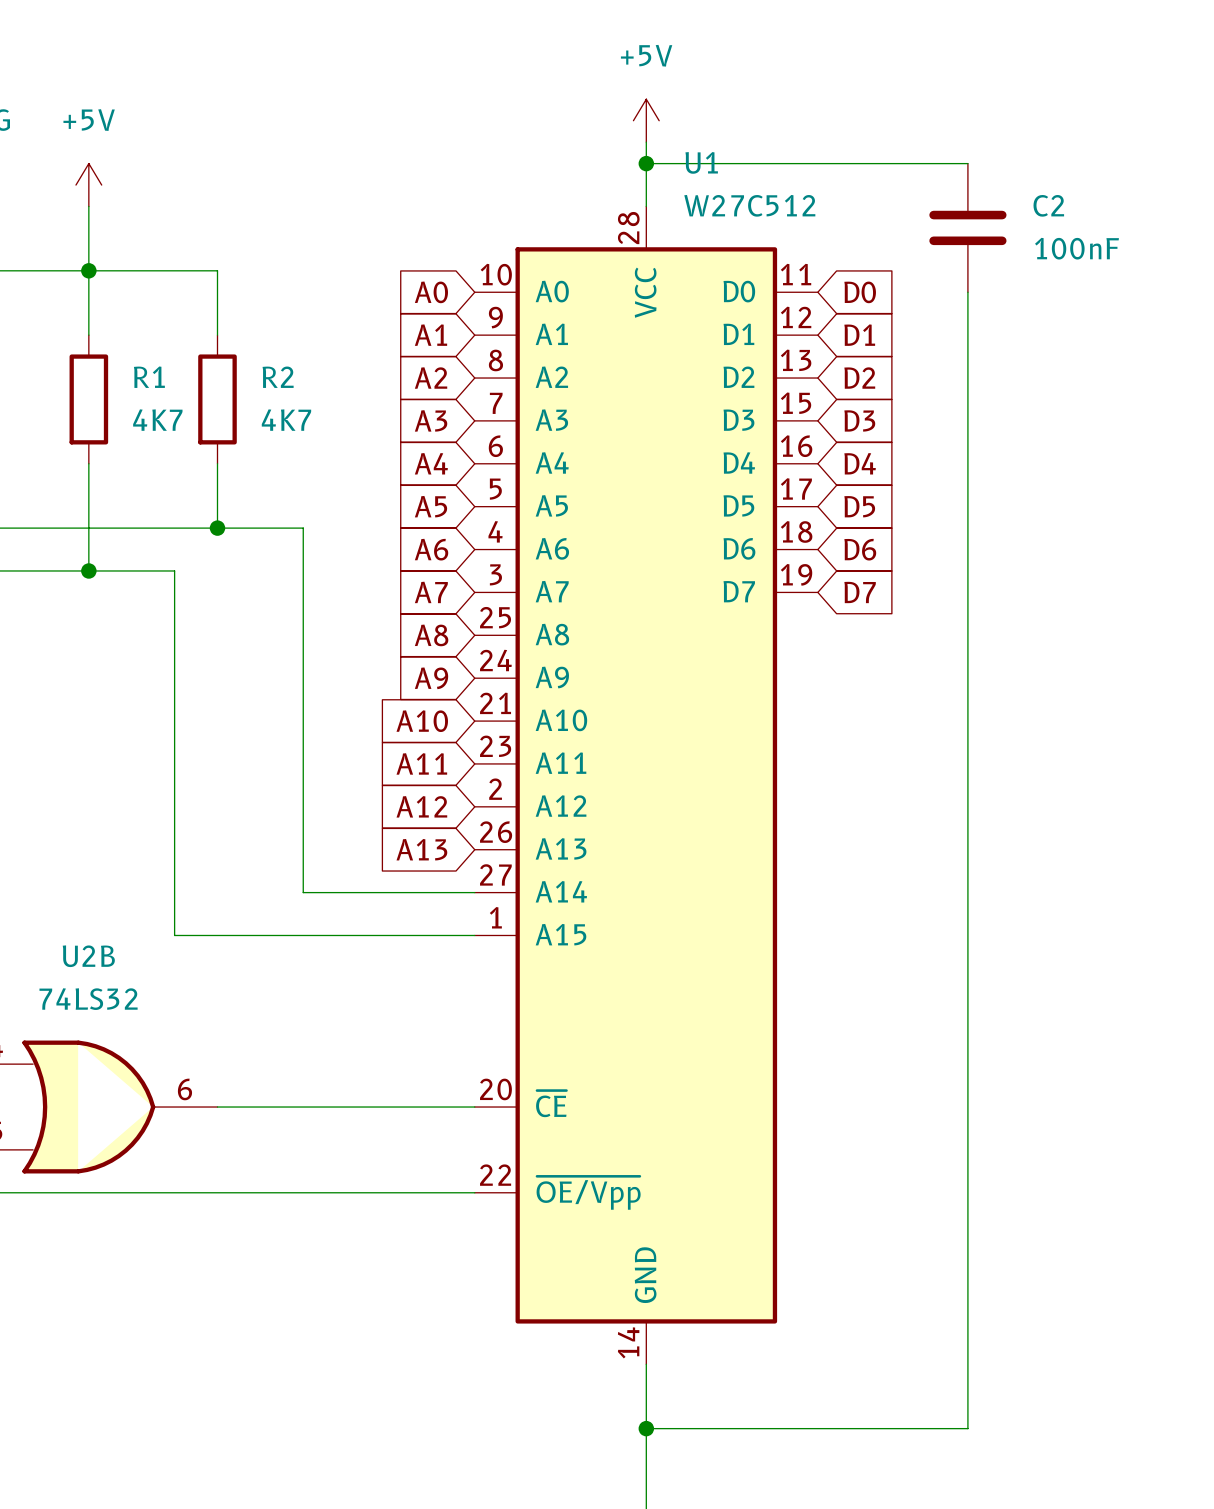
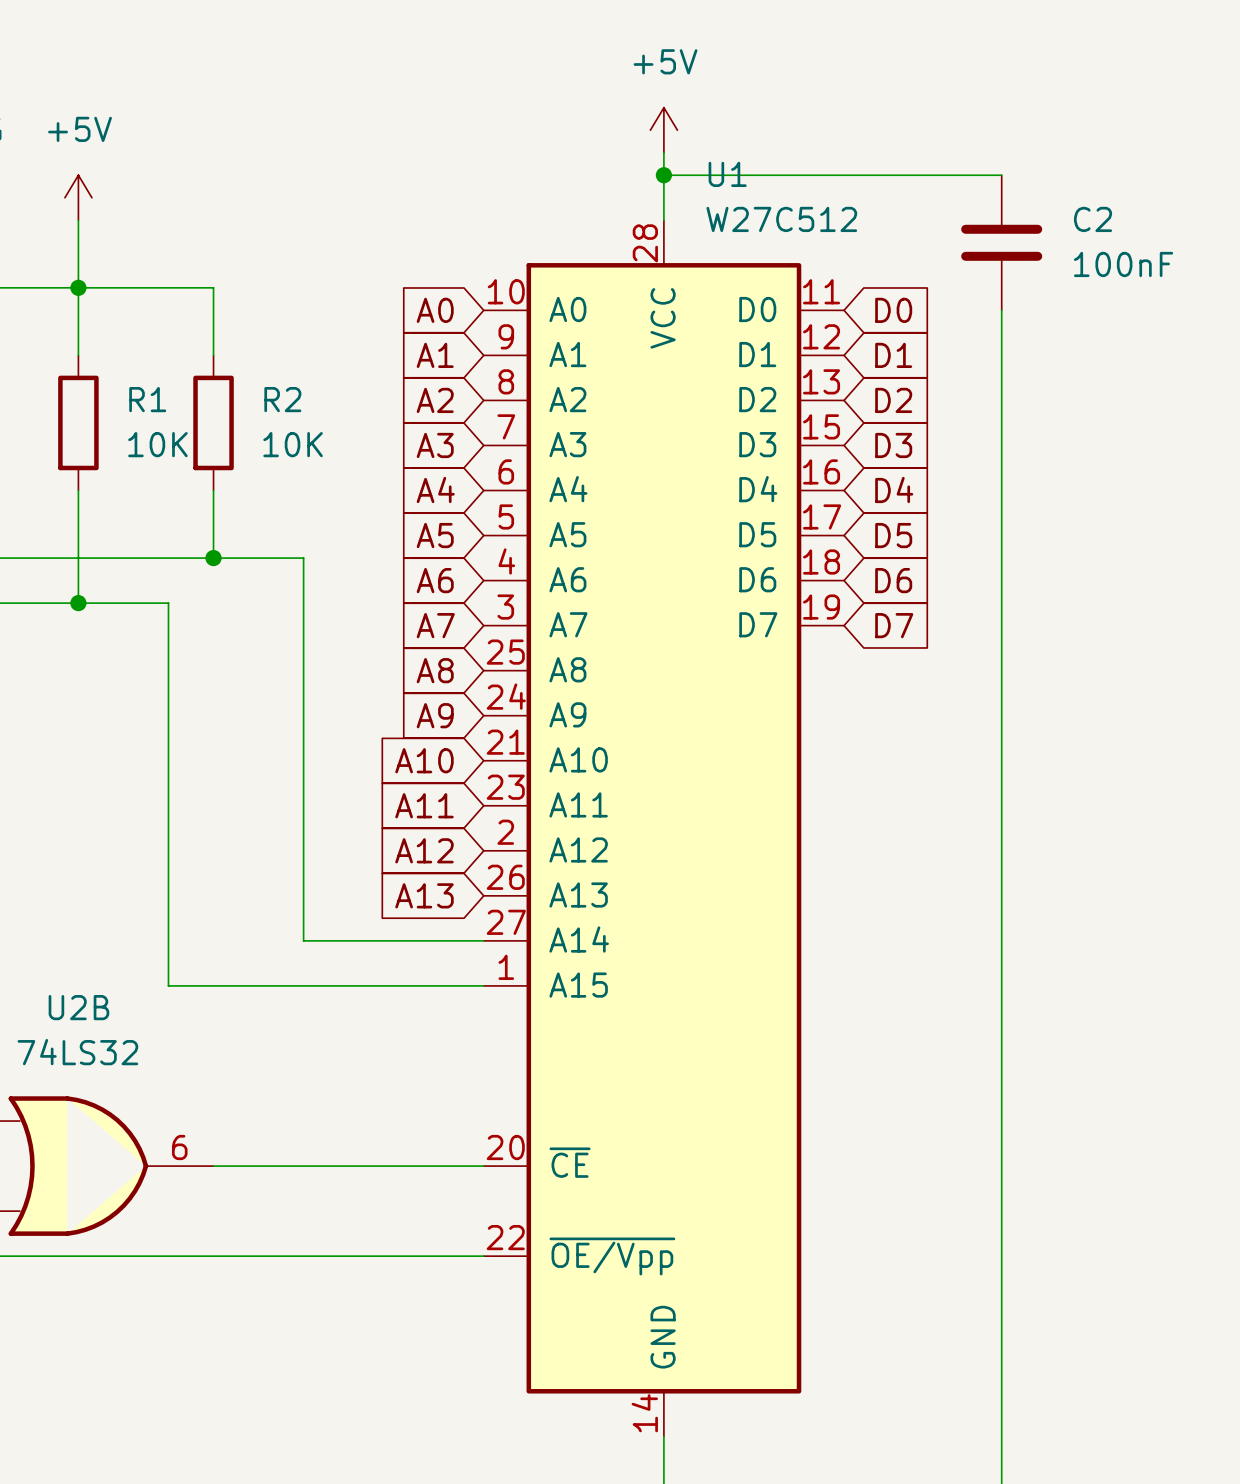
R1 value: 4K7 (157, 420) -> 10K (157, 444)
R2 value: 4K7 (286, 420) -> 10K (293, 444)

